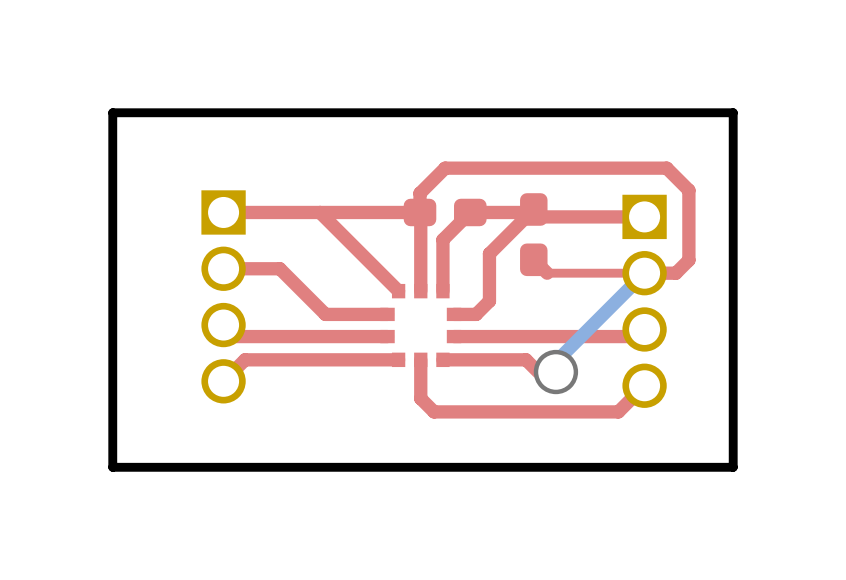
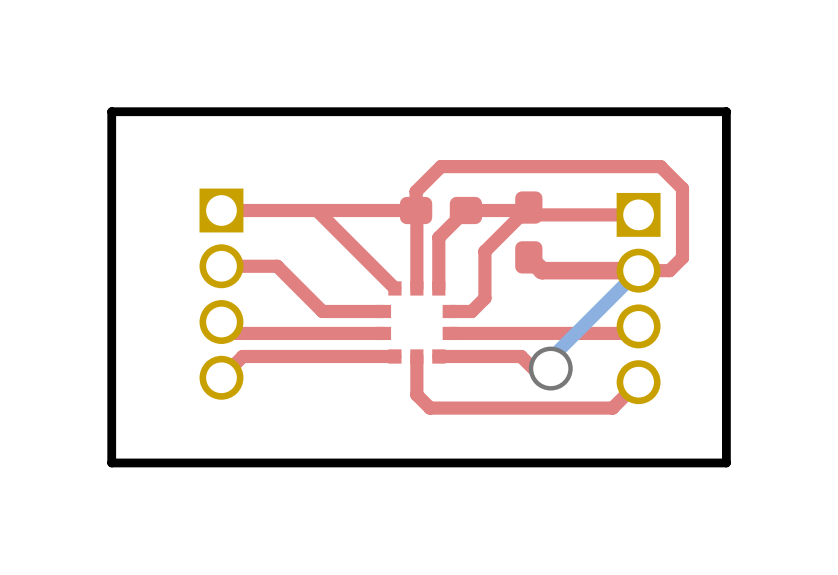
top track width: thin (533, 259) (547, 273) (644, 273) -> thick (528, 257) (542, 270) (638, 270)

